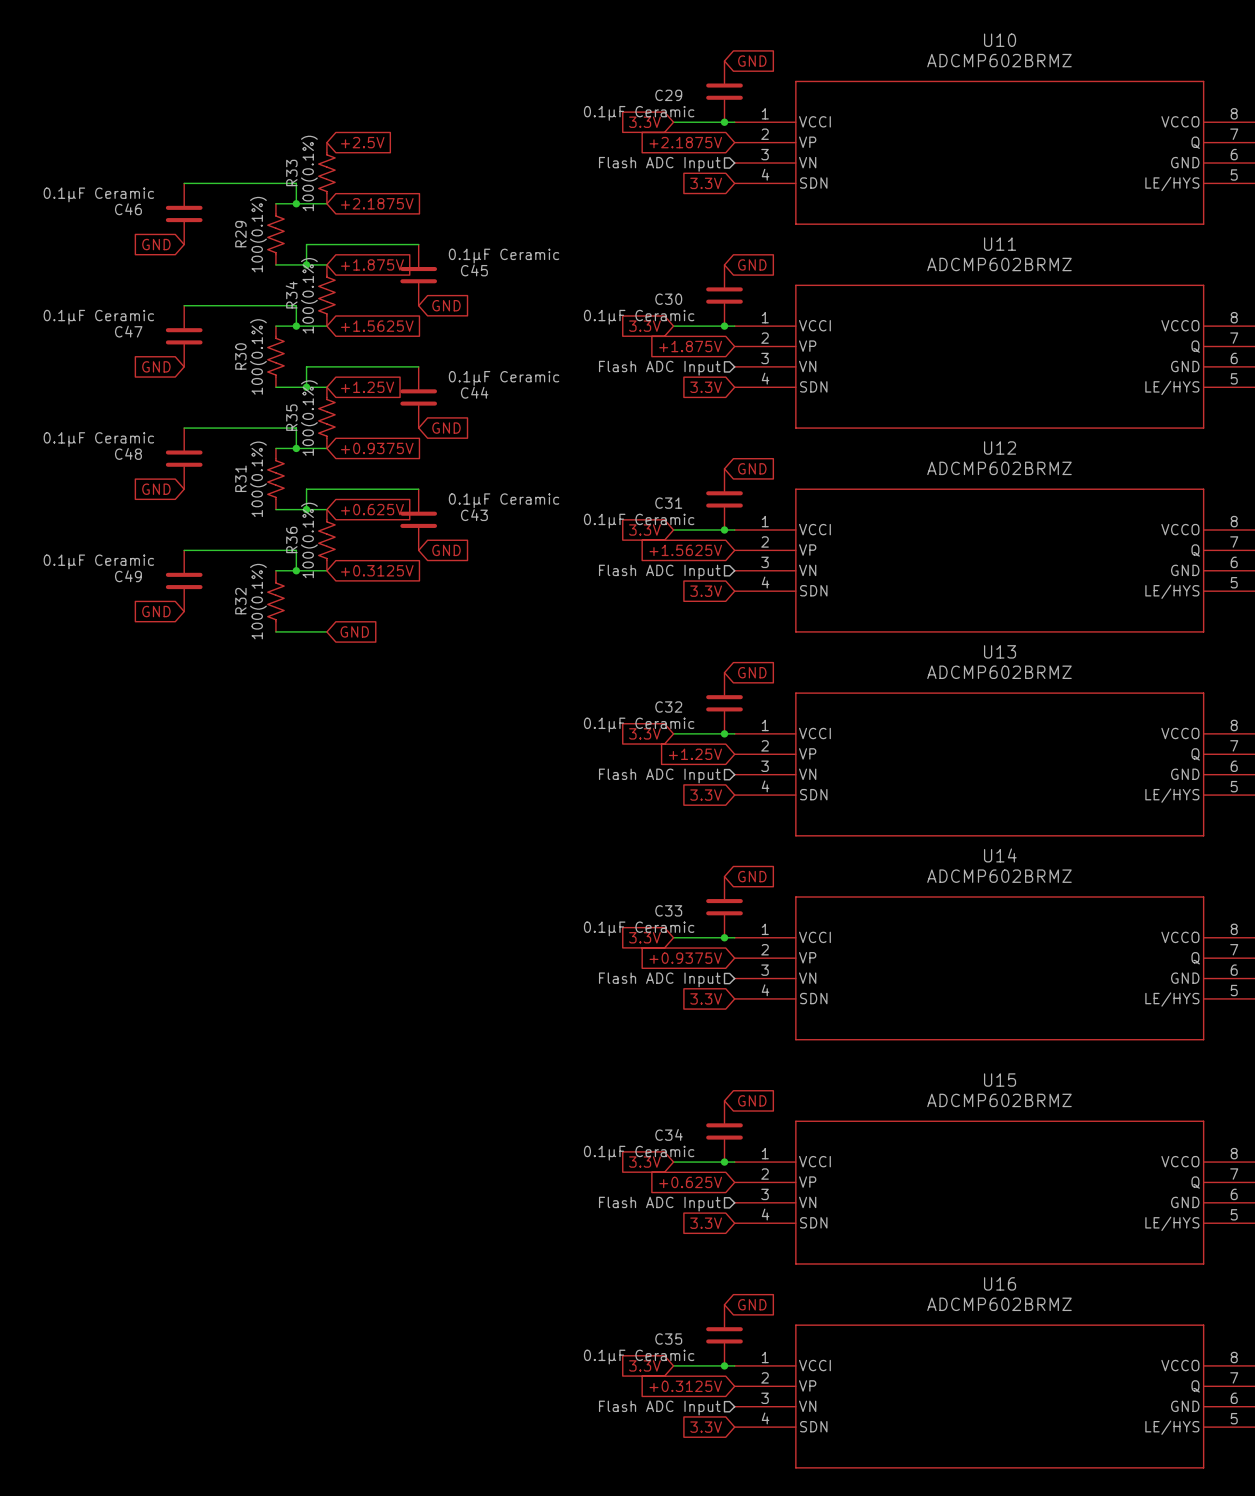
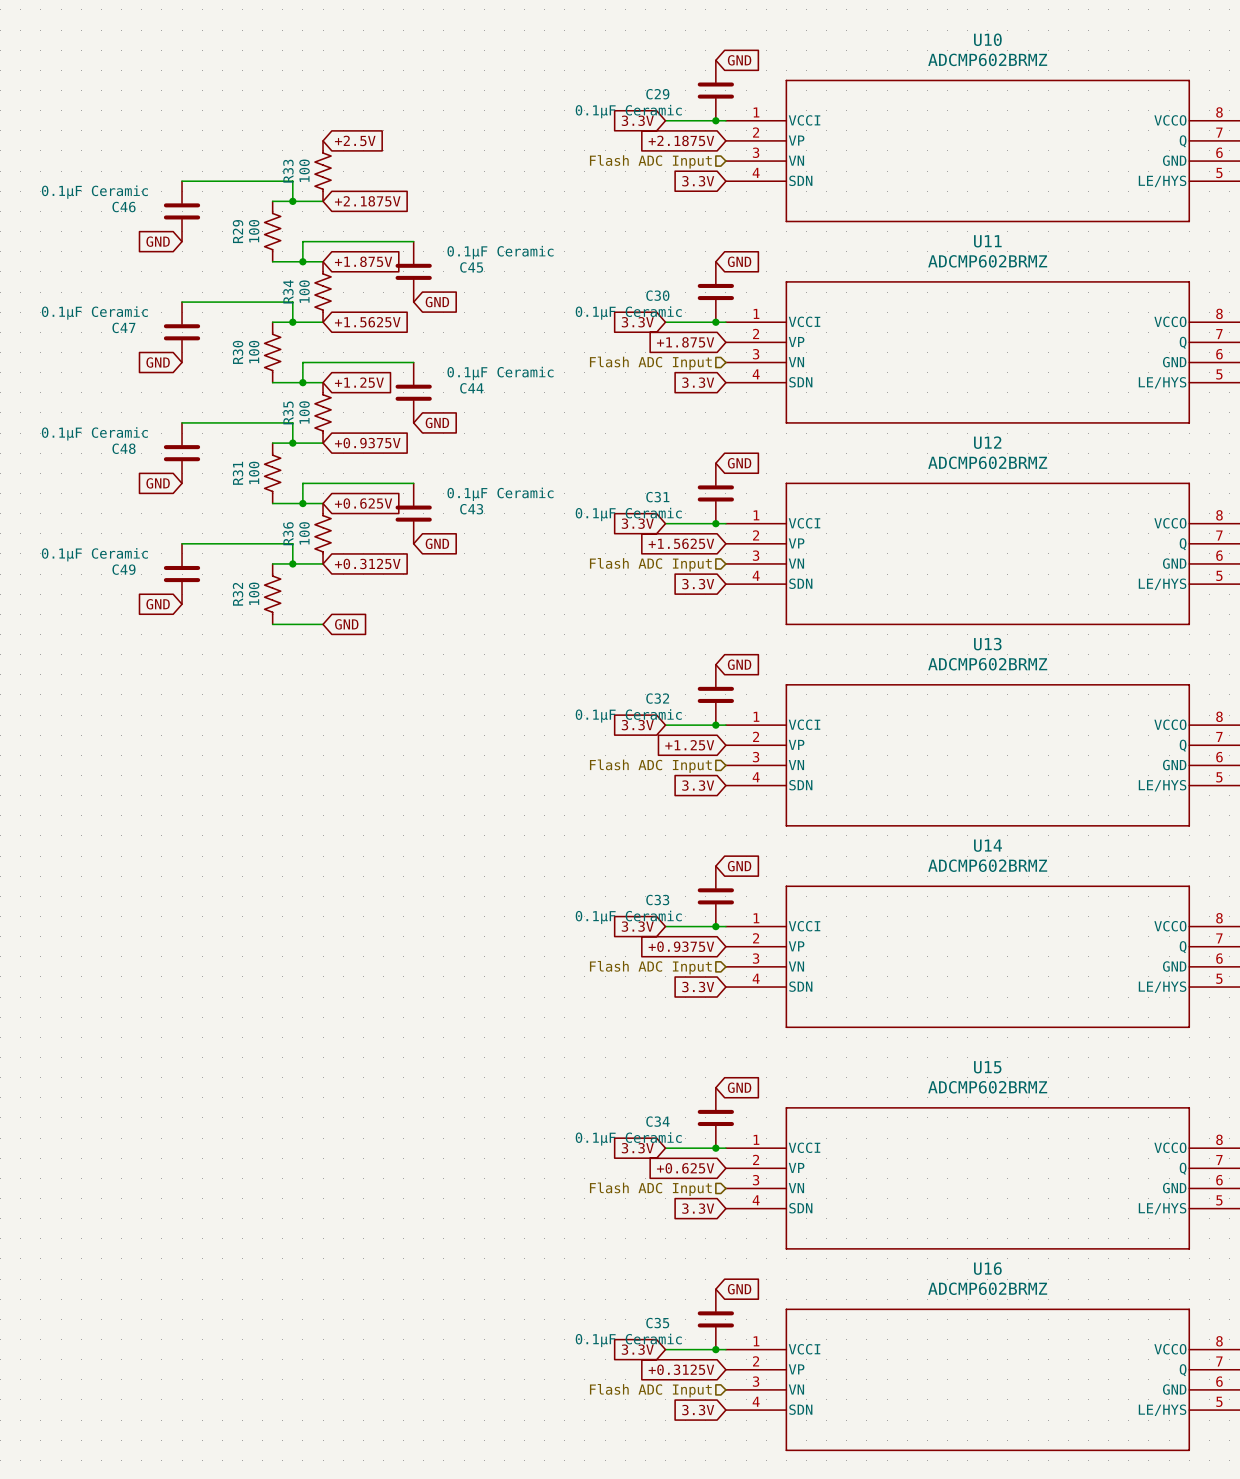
R33 value: 100(0.1%) (309, 173) -> 100 (304, 170)
R29 value: 100(0.1%) (258, 234) -> 100 (254, 231)
R34 value: 100(0.1%) (309, 295) -> 100 (304, 291)
R30 value: 100(0.1%) (258, 356) -> 100 (254, 352)
R35 value: 100(0.1%) (309, 418) -> 100 (304, 412)
R31 value: 100(0.1%) (258, 479) -> 100 (254, 472)
R36 value: 100(0.1%) (309, 540) -> 100 (304, 533)
R32 value: 100(0.1%) (258, 601) -> 100 (254, 593)

